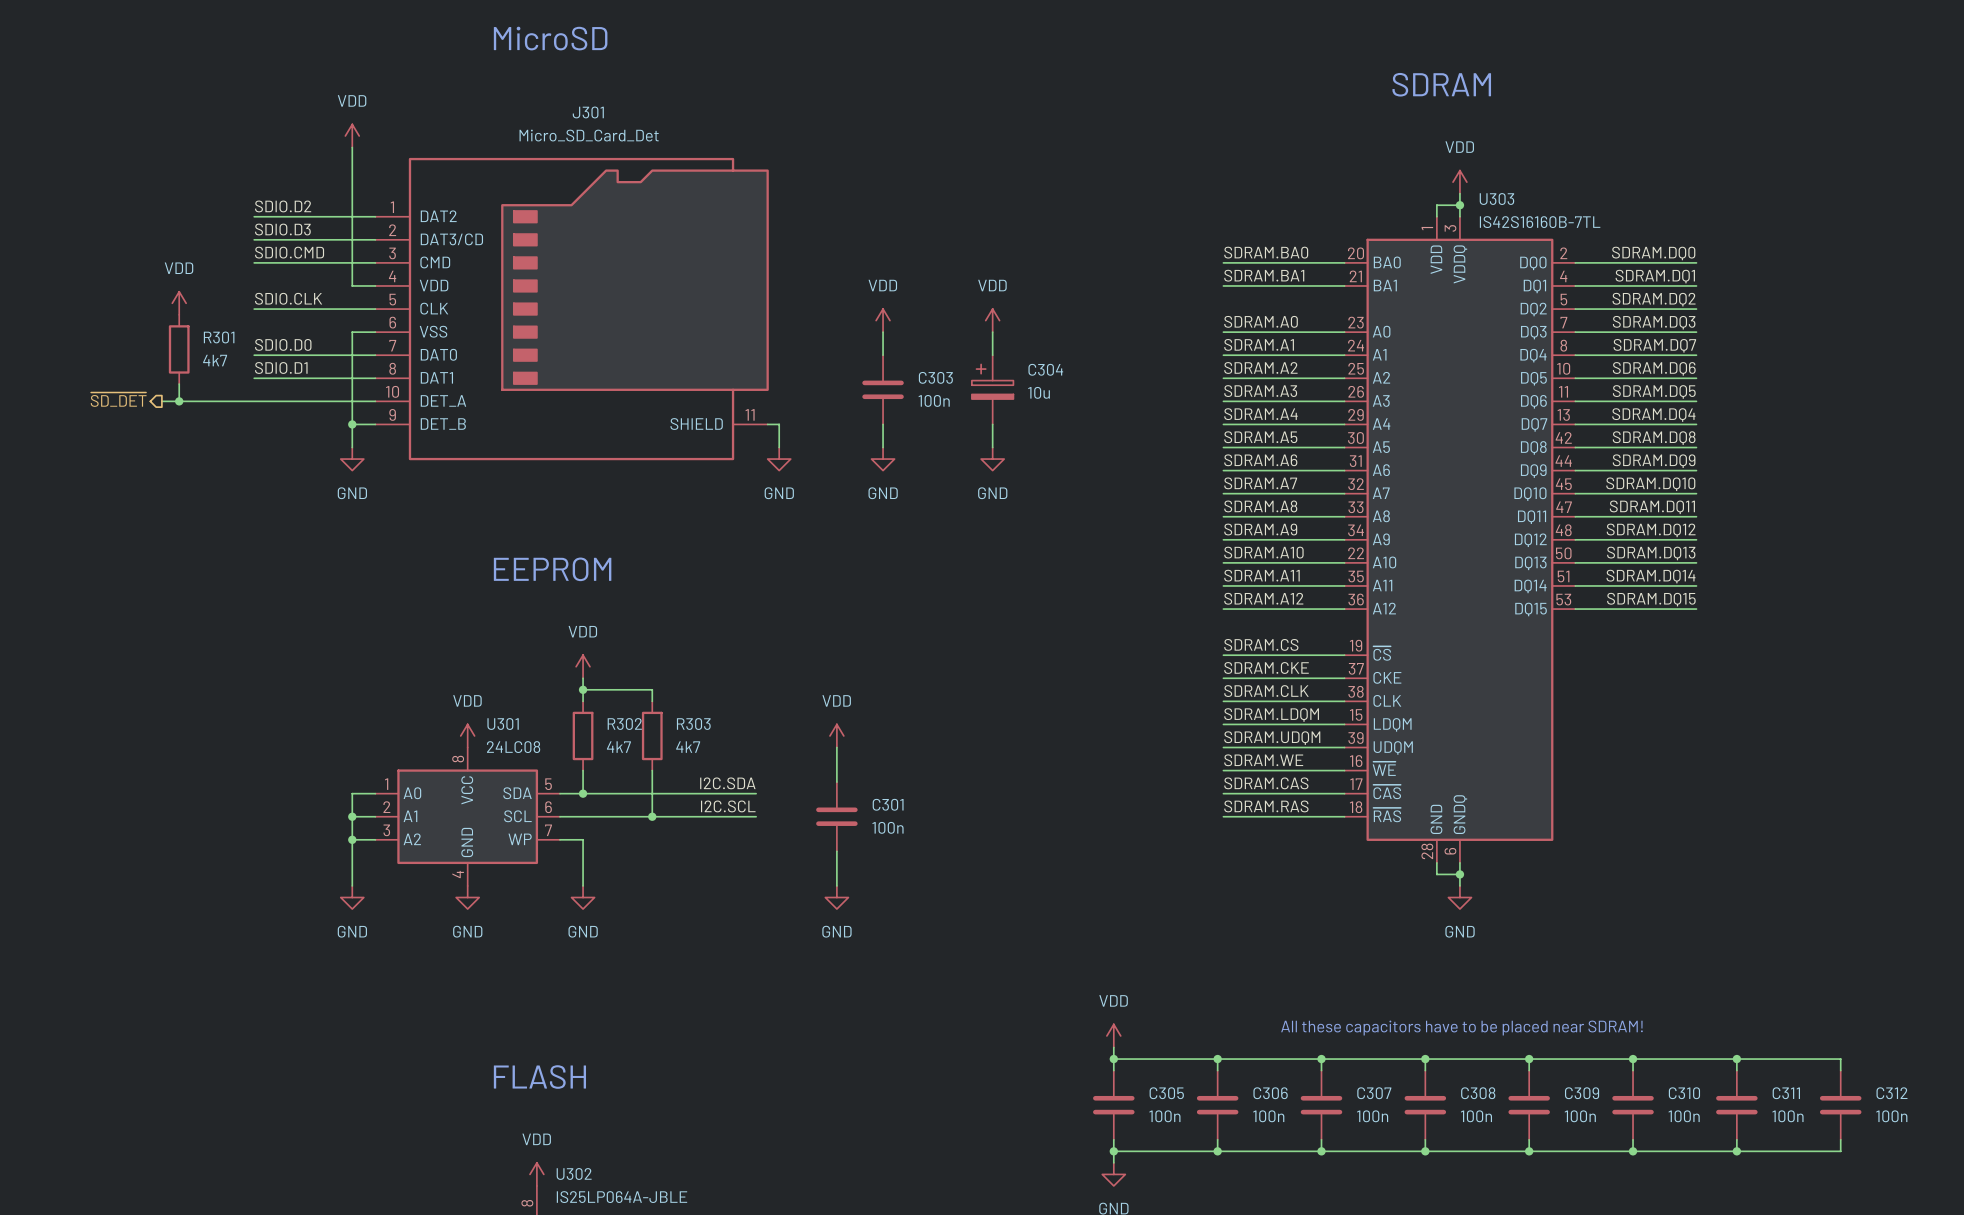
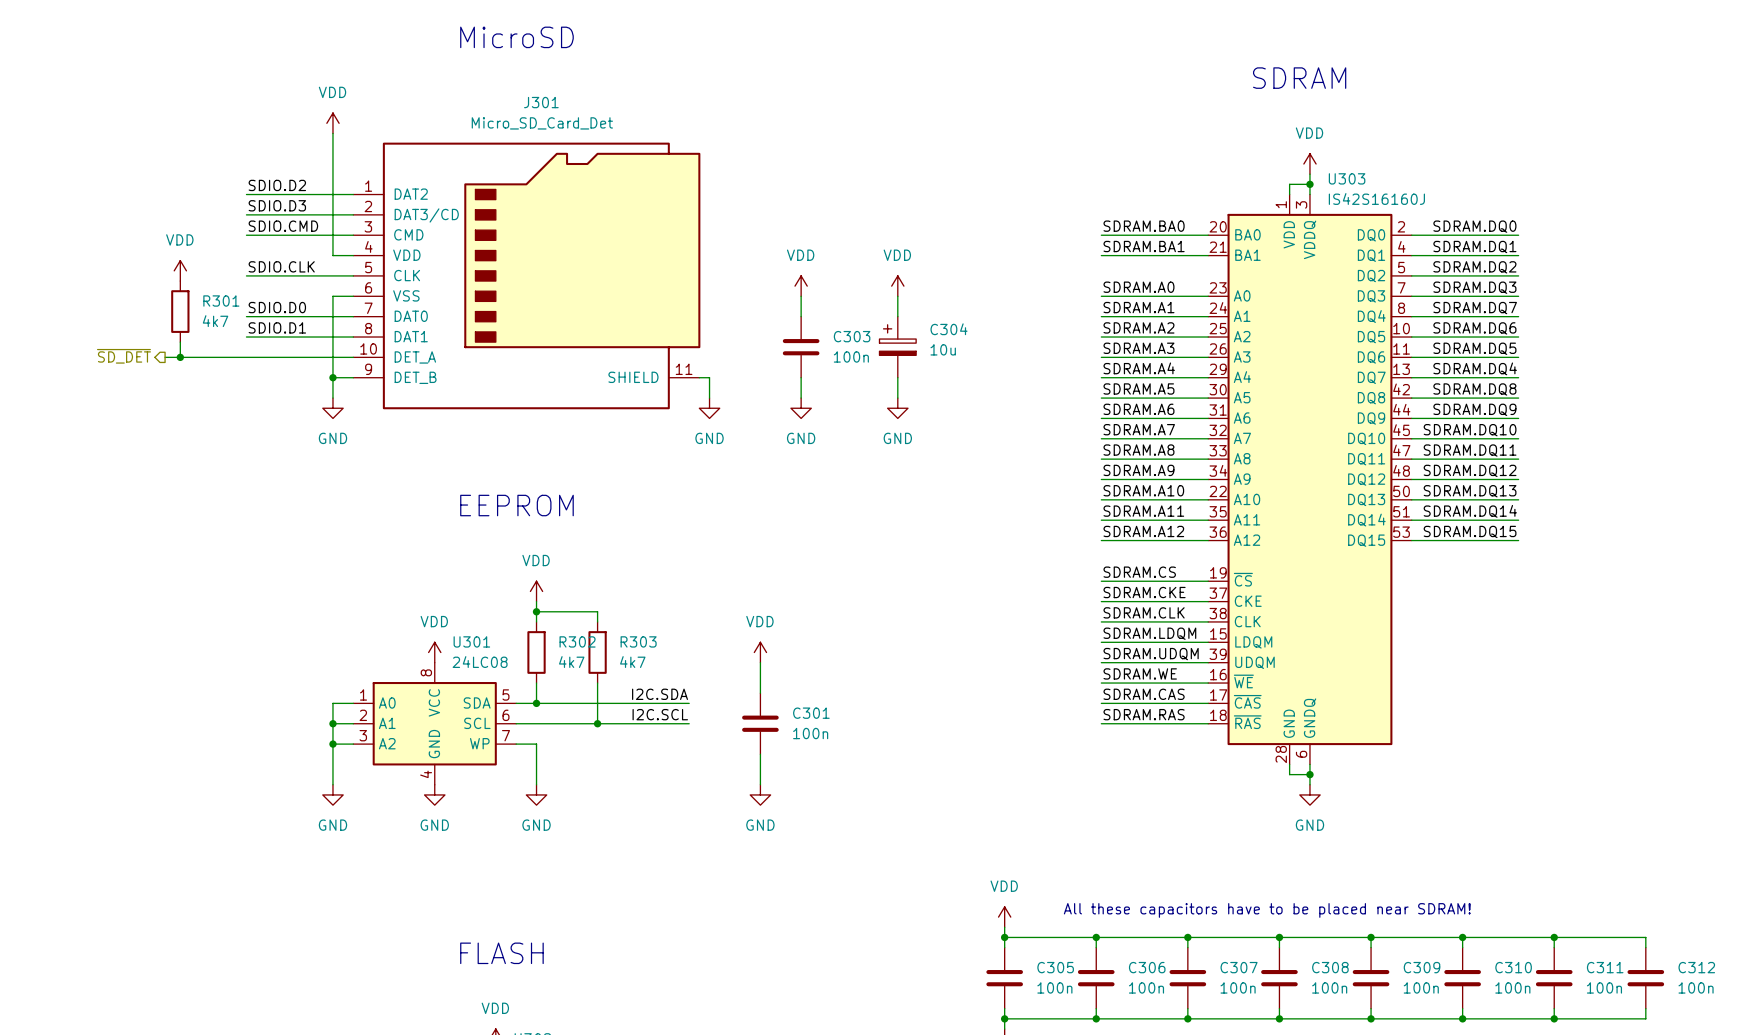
U303 value: IS42S16160B-7TL (1540, 222) -> IS42S16160J (1376, 198)

